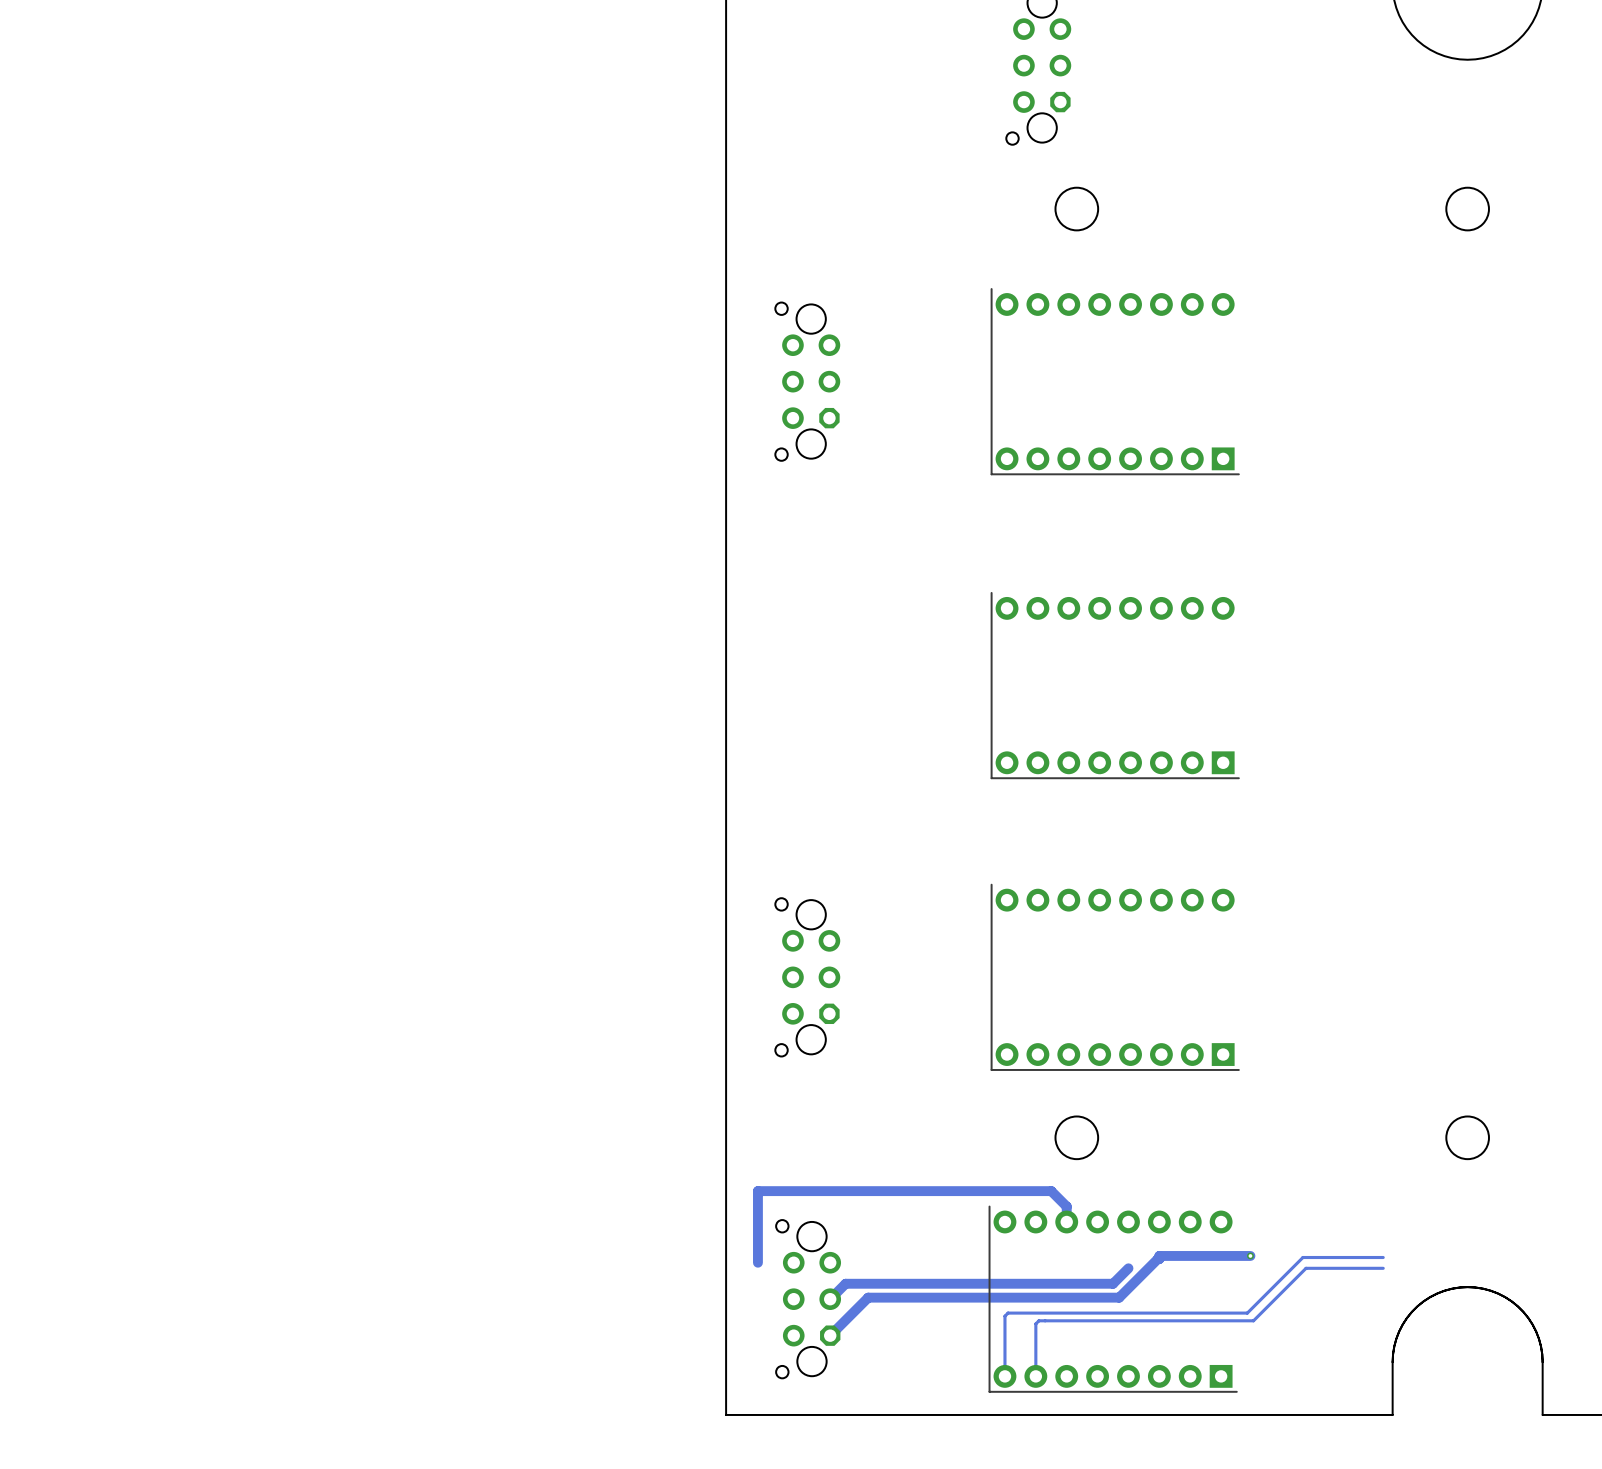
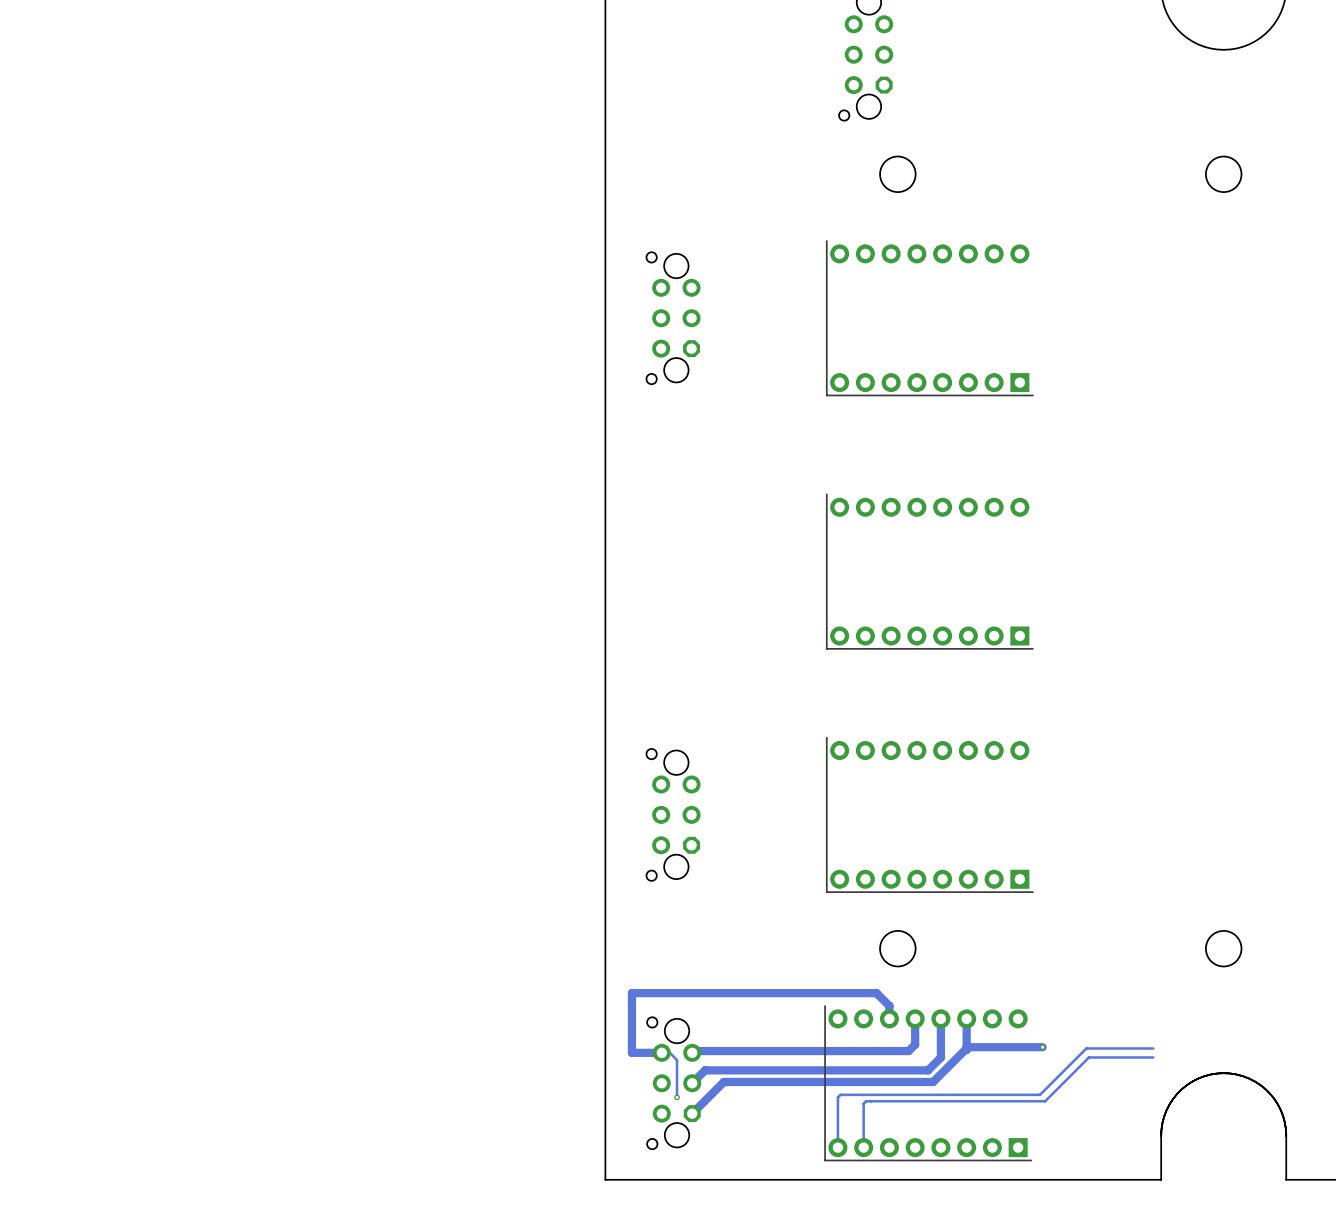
track: none -> (915, 1018) (915, 1044) (908, 1051) (694, 1051) (692, 1052)
track: none -> (940, 1018) (940, 1057)
track: none -> (966, 1018) (966, 1047)
track: none -> (631, 1052) (669, 1052) (677, 1060) (677, 1097)
via: none -> (677, 1097)

